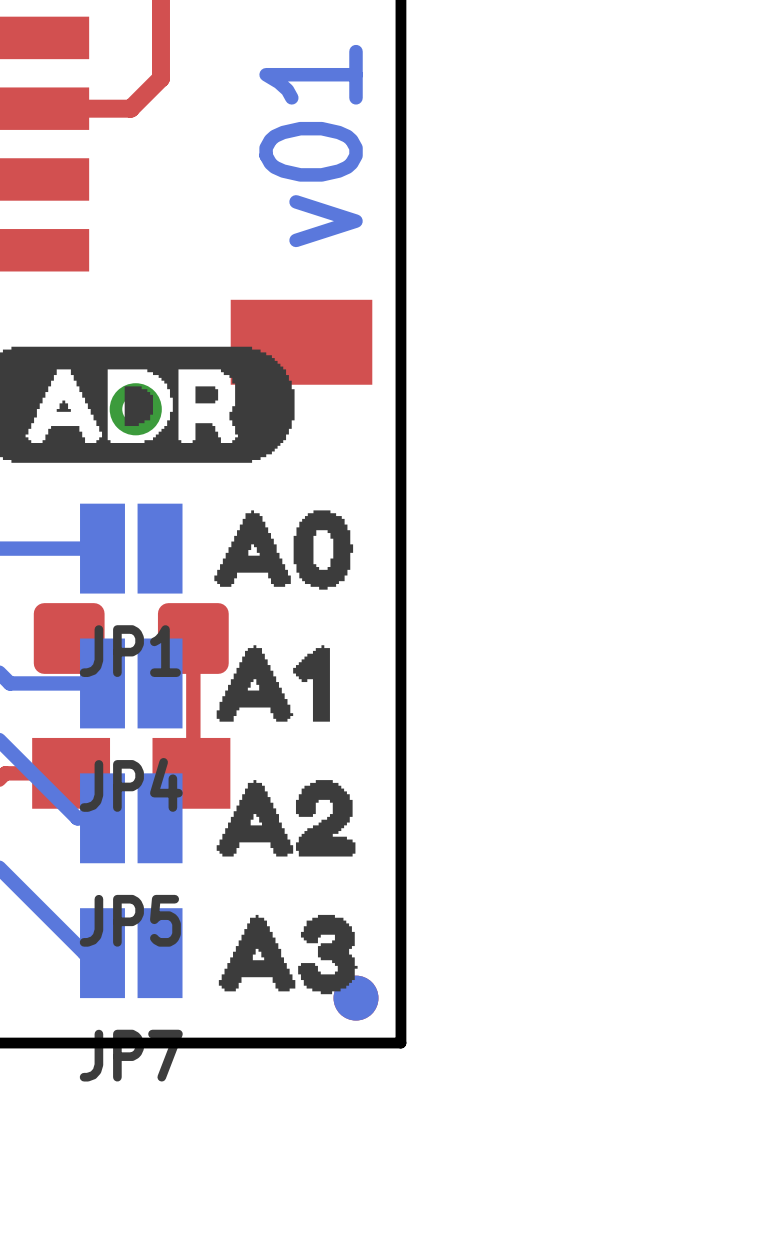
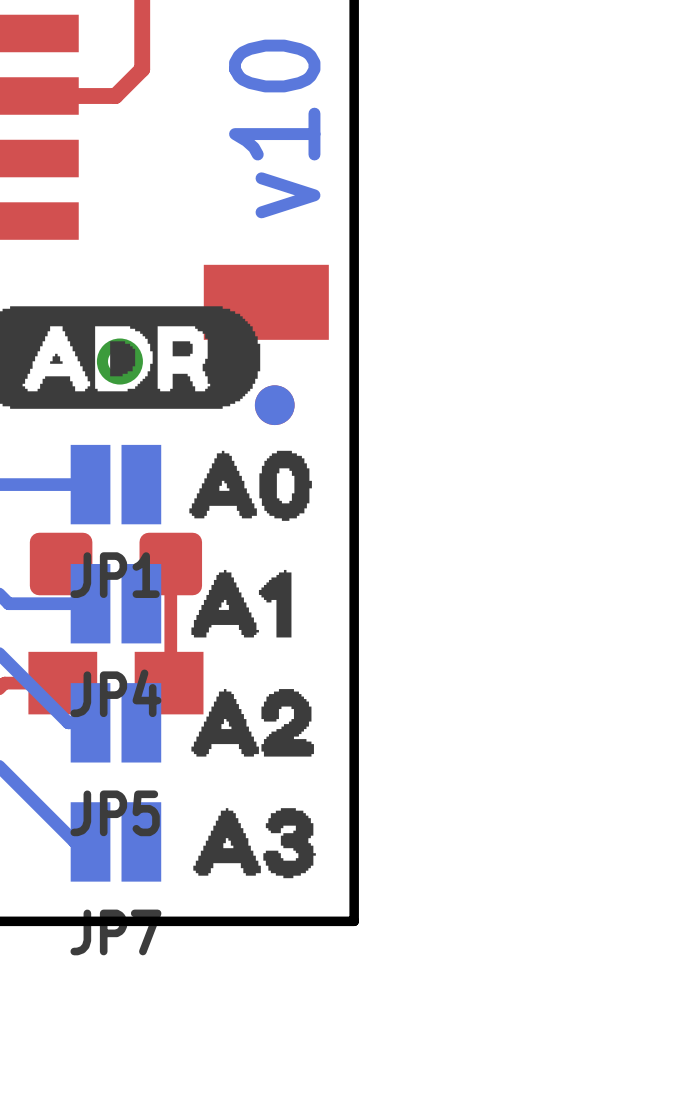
text: v01 (311, 146) -> v10 (274, 128)
part position: (356, 998) -> (274, 405)

